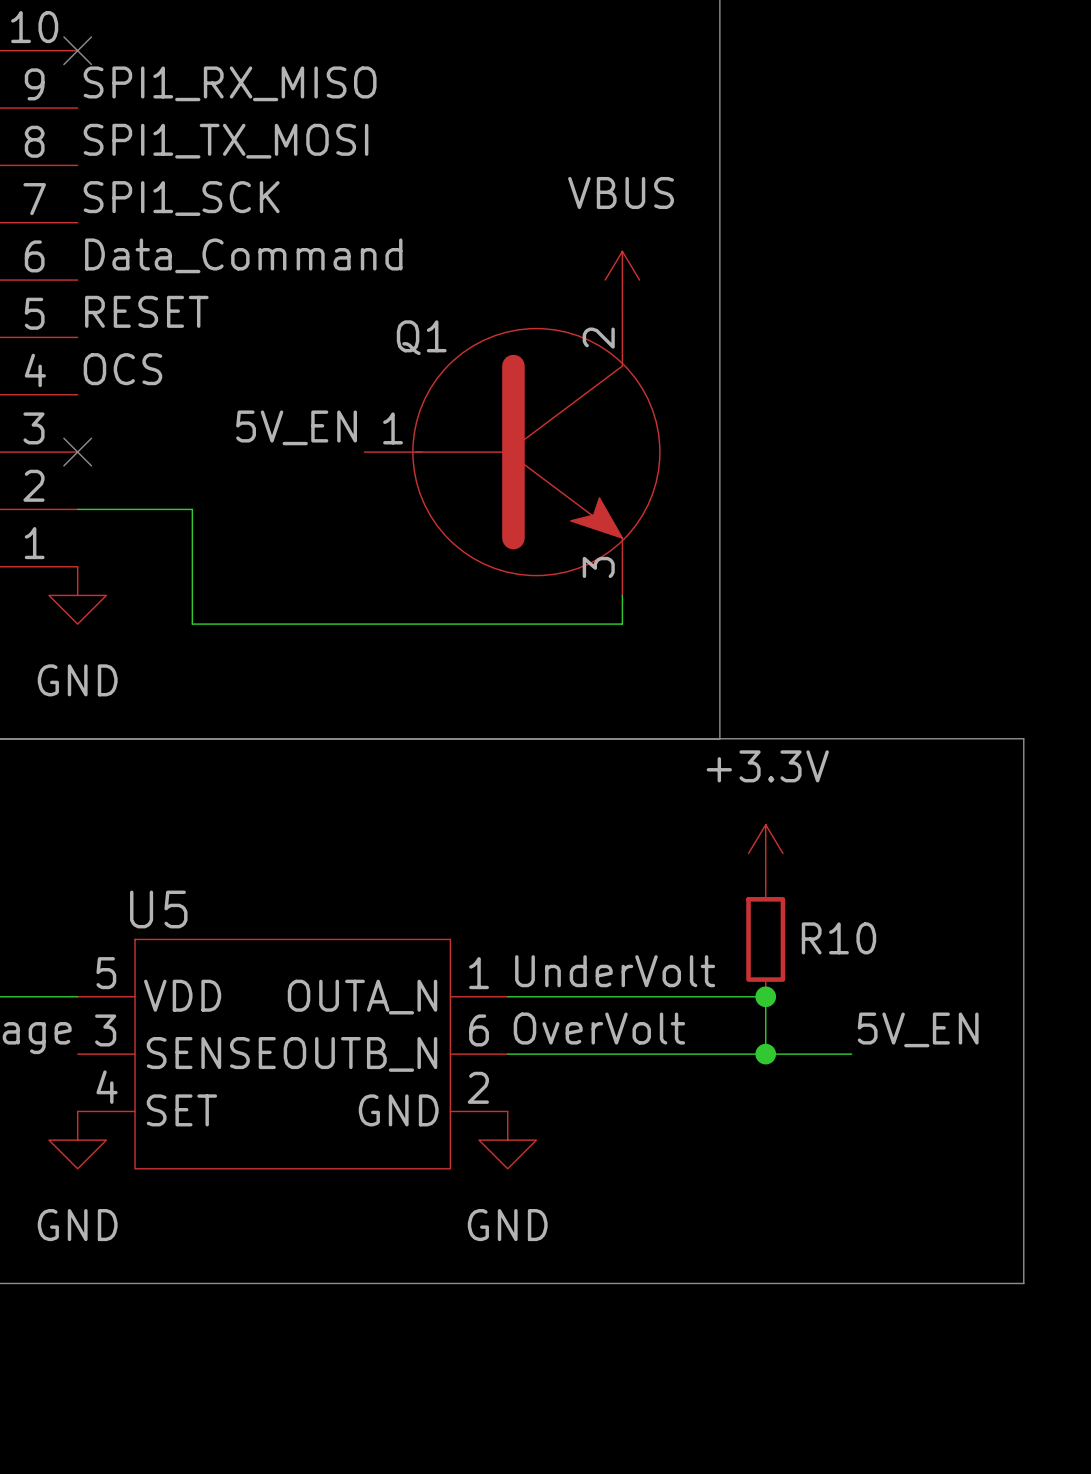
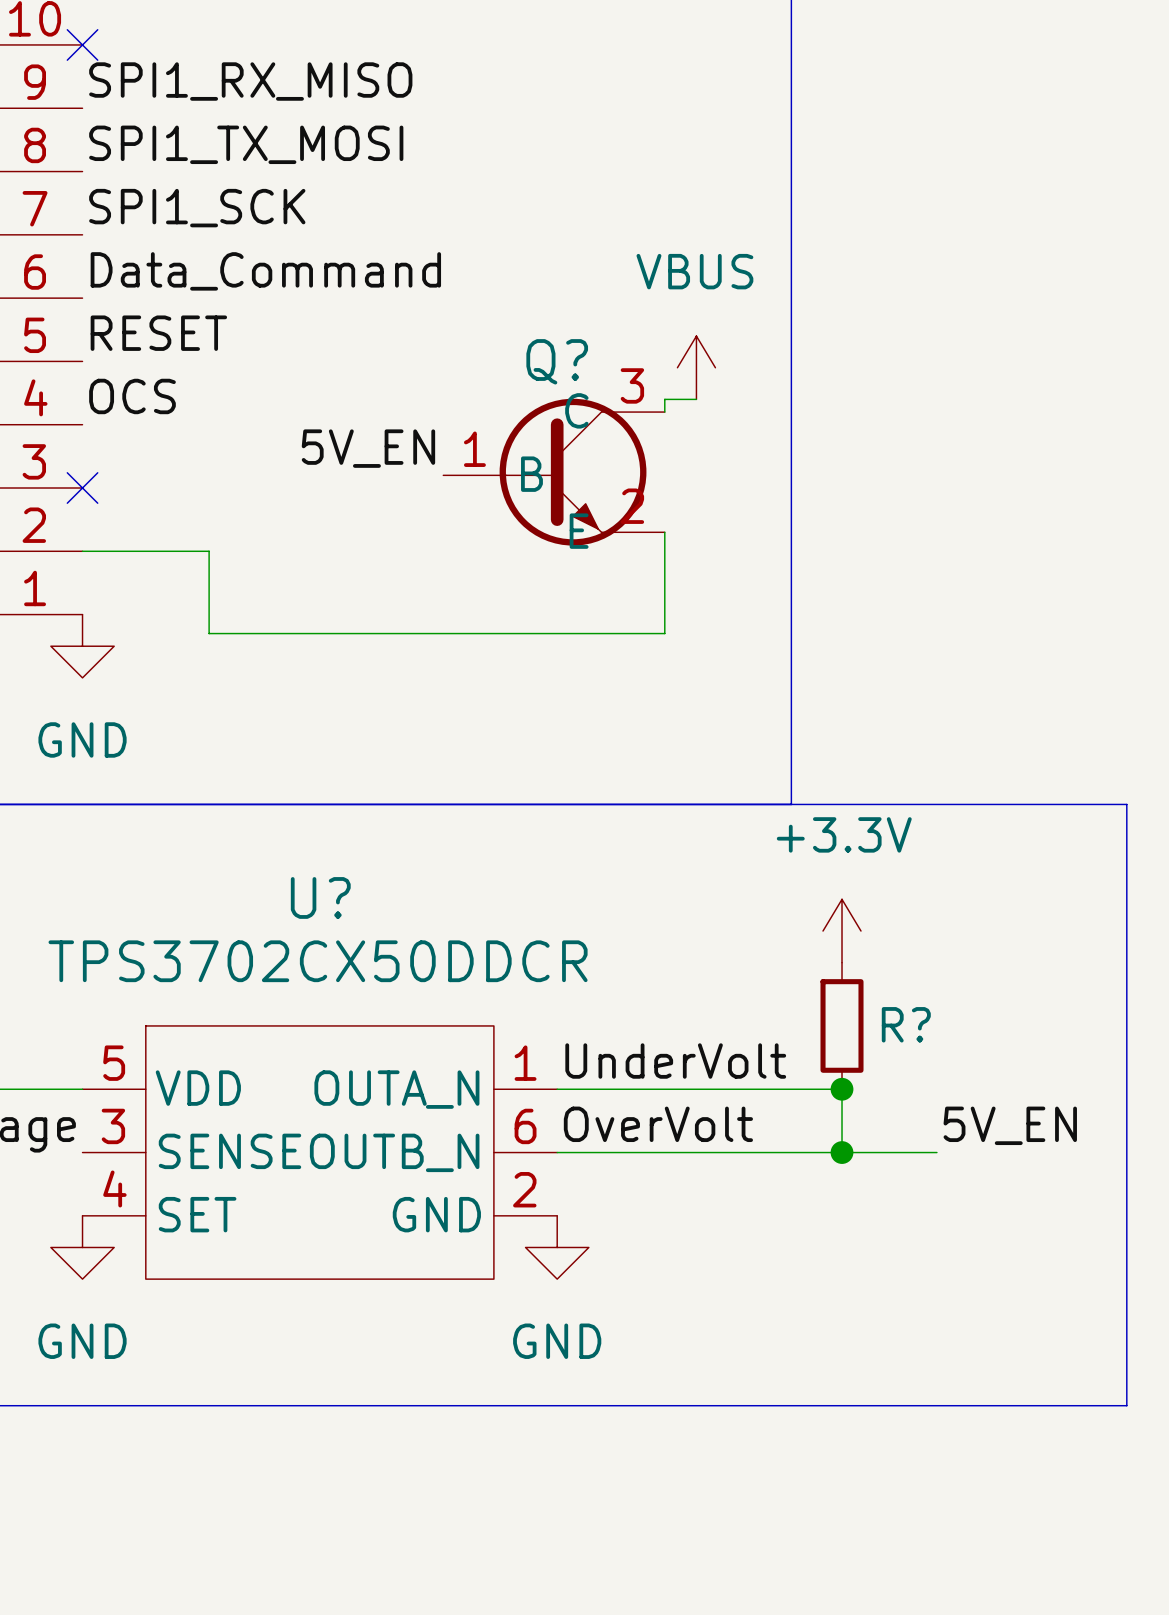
power symbol position: VBUS (622, 280) -> VBUS (696, 367)
wire: none -> (696, 399) (664, 399) (664, 412)
label position: 5V_EN (296, 427) -> 5V_EN (368, 448)
Q?: none -> (554, 472)
Q1: (512, 452) -> none
wire: (192, 583) (192, 624) (622, 624) (622, 595) -> (209, 633) (664, 633) (664, 532)
U5 value: none -> TPS3702CX50DDCR (318, 961)
U5 name: U5 (158, 909) -> U? (320, 897)
R10 name: R10 (838, 938) -> R? (906, 1024)

